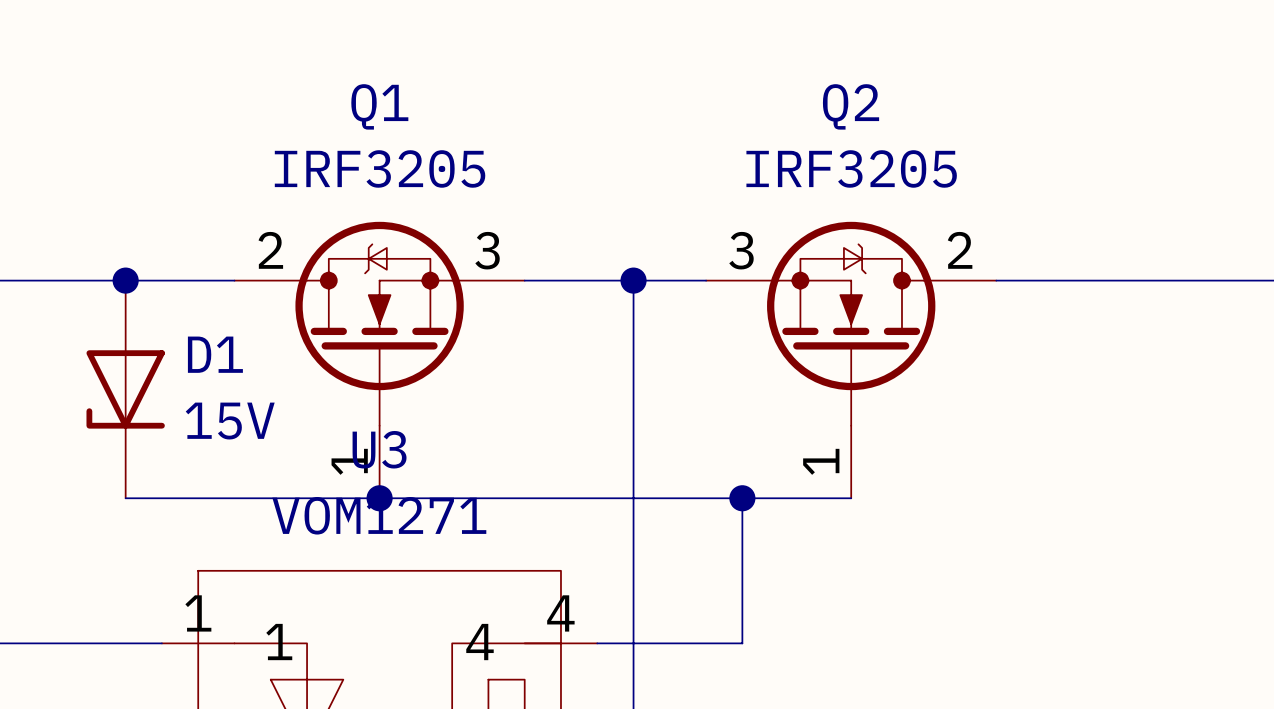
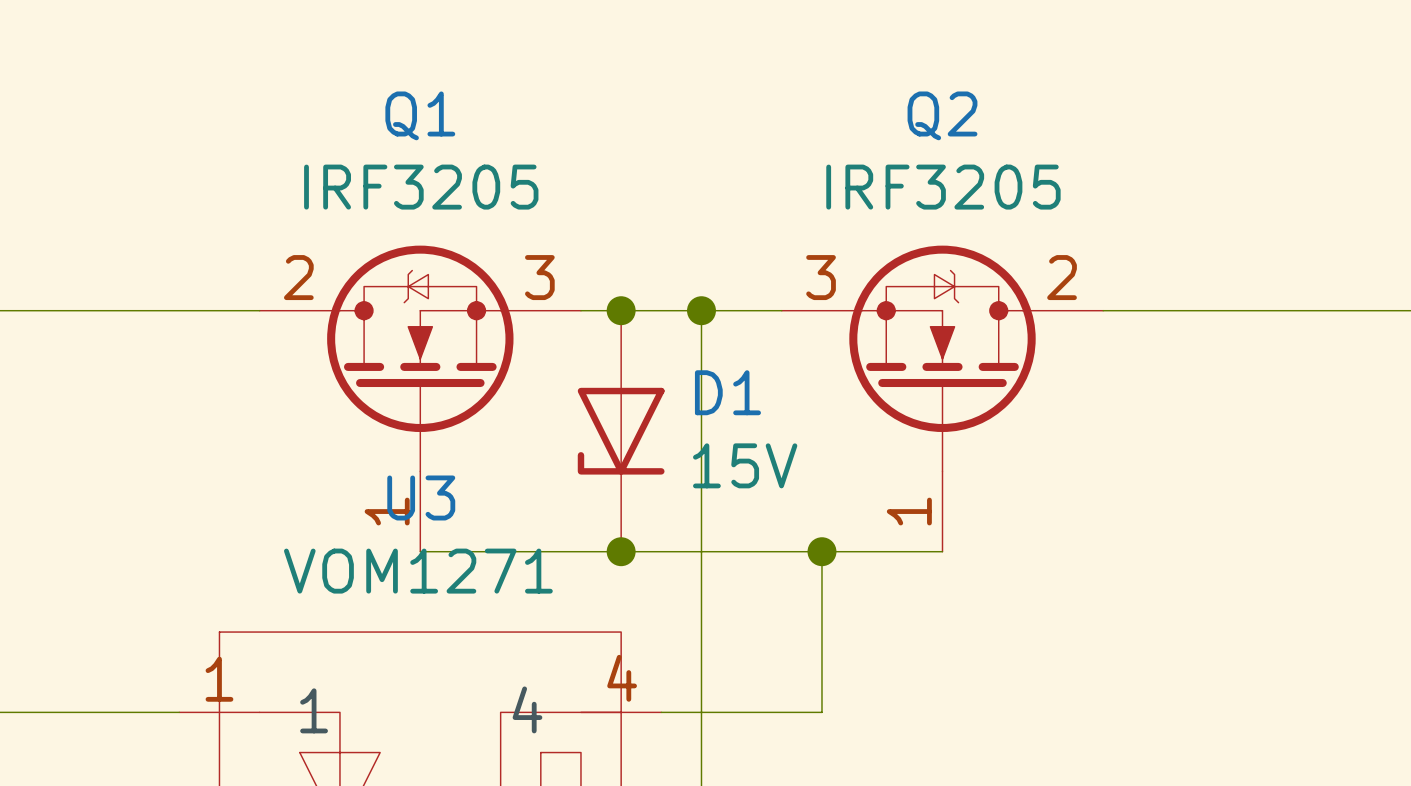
junction: (125, 280) -> none
junction: none -> (621, 310)
D1 position: (125, 389) -> (621, 431)
wire: (125, 498) (379, 498) -> none
junction: (379, 498) -> none
junction: none -> (621, 551)

